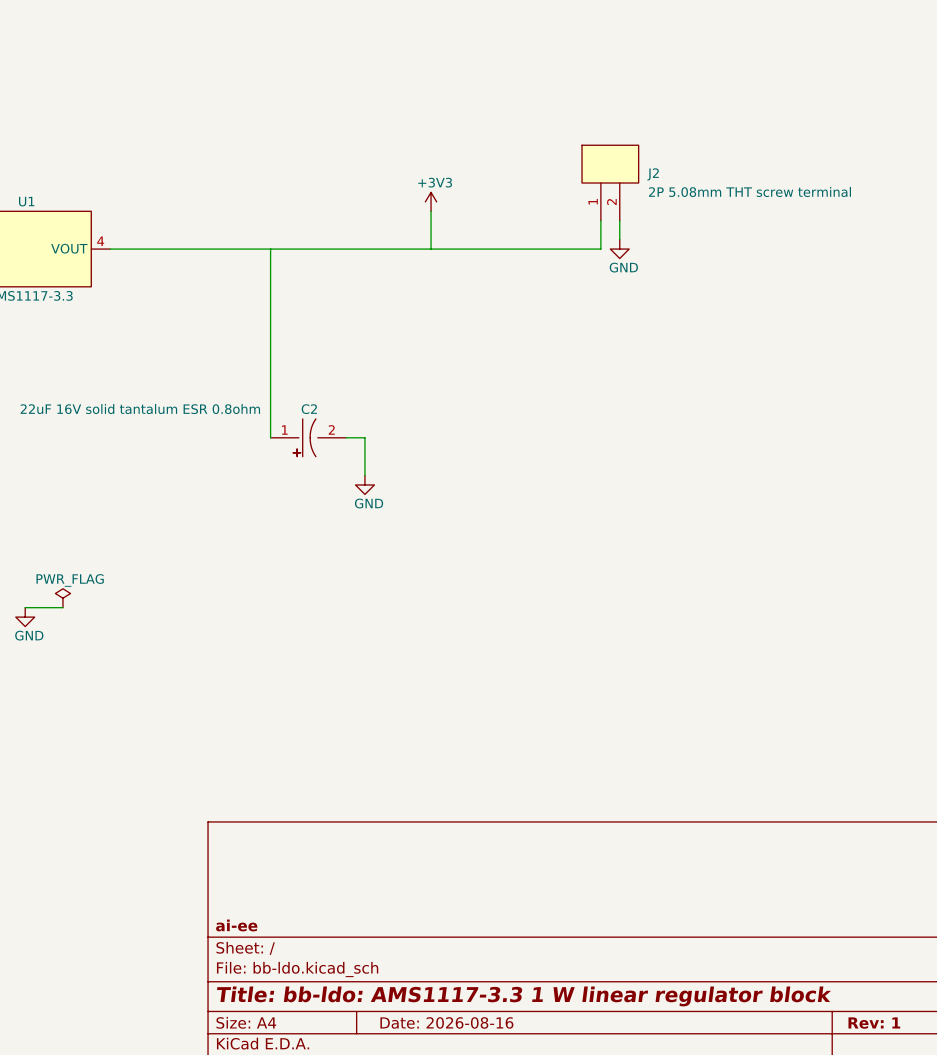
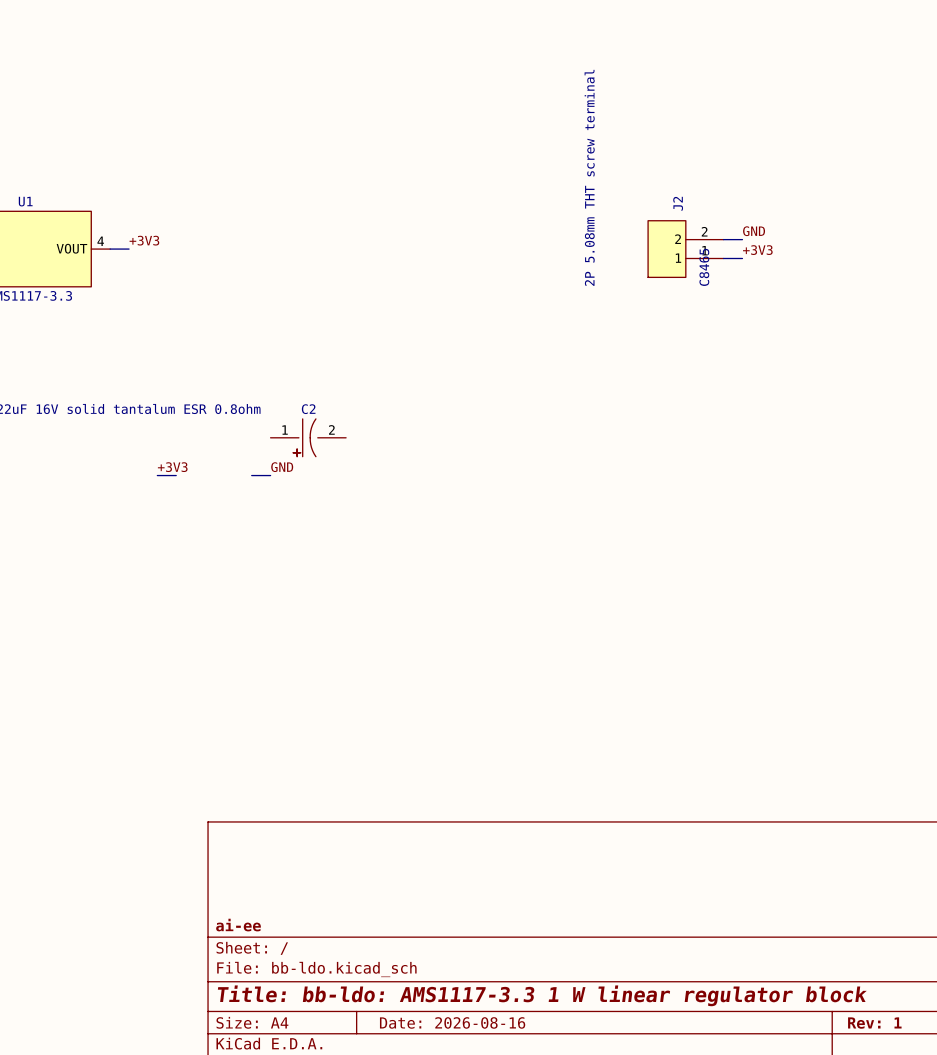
J2 symbol: [582, 145, 639, 221] -> [648, 220, 724, 278]
J2 name position: J2 (653, 174) -> J2 (678, 203)
J2 value position: 2P 5.08mm THT screw terminal (750, 191) -> 2P 5.08mm THT screw terminal (589, 177)
power symbol: +3V3 (431, 201) -> none
wire: (431, 211) (431, 249) -> none
wire: (600, 220) (600, 249) (129, 249) -> none
wire: (619, 220) (619, 239) -> none
label: none -> GND (754, 231)
wire: none -> (723, 239) (742, 239)
label: none -> +3V3 (144, 240)
wire: (270, 249) (270, 437) -> none
power symbol: GND (619, 249) -> none
label: none -> +3V3 (757, 250)
wire: none -> (723, 258) (742, 258)
J2 text: none -> C8465 (704, 267)
wire: (346, 437) (364, 437) (364, 475) -> none
label: none -> +3V3 (172, 467)
label: none -> GND (282, 467)
wire: none -> (157, 475) (176, 475)
wire: none -> (251, 475) (270, 475)
power symbol: GND (364, 484) -> none
power symbol: PWR_FLAG (62, 598) -> none
wire: (25, 607) (62, 607) -> none
power symbol: GND (25, 617) -> none

